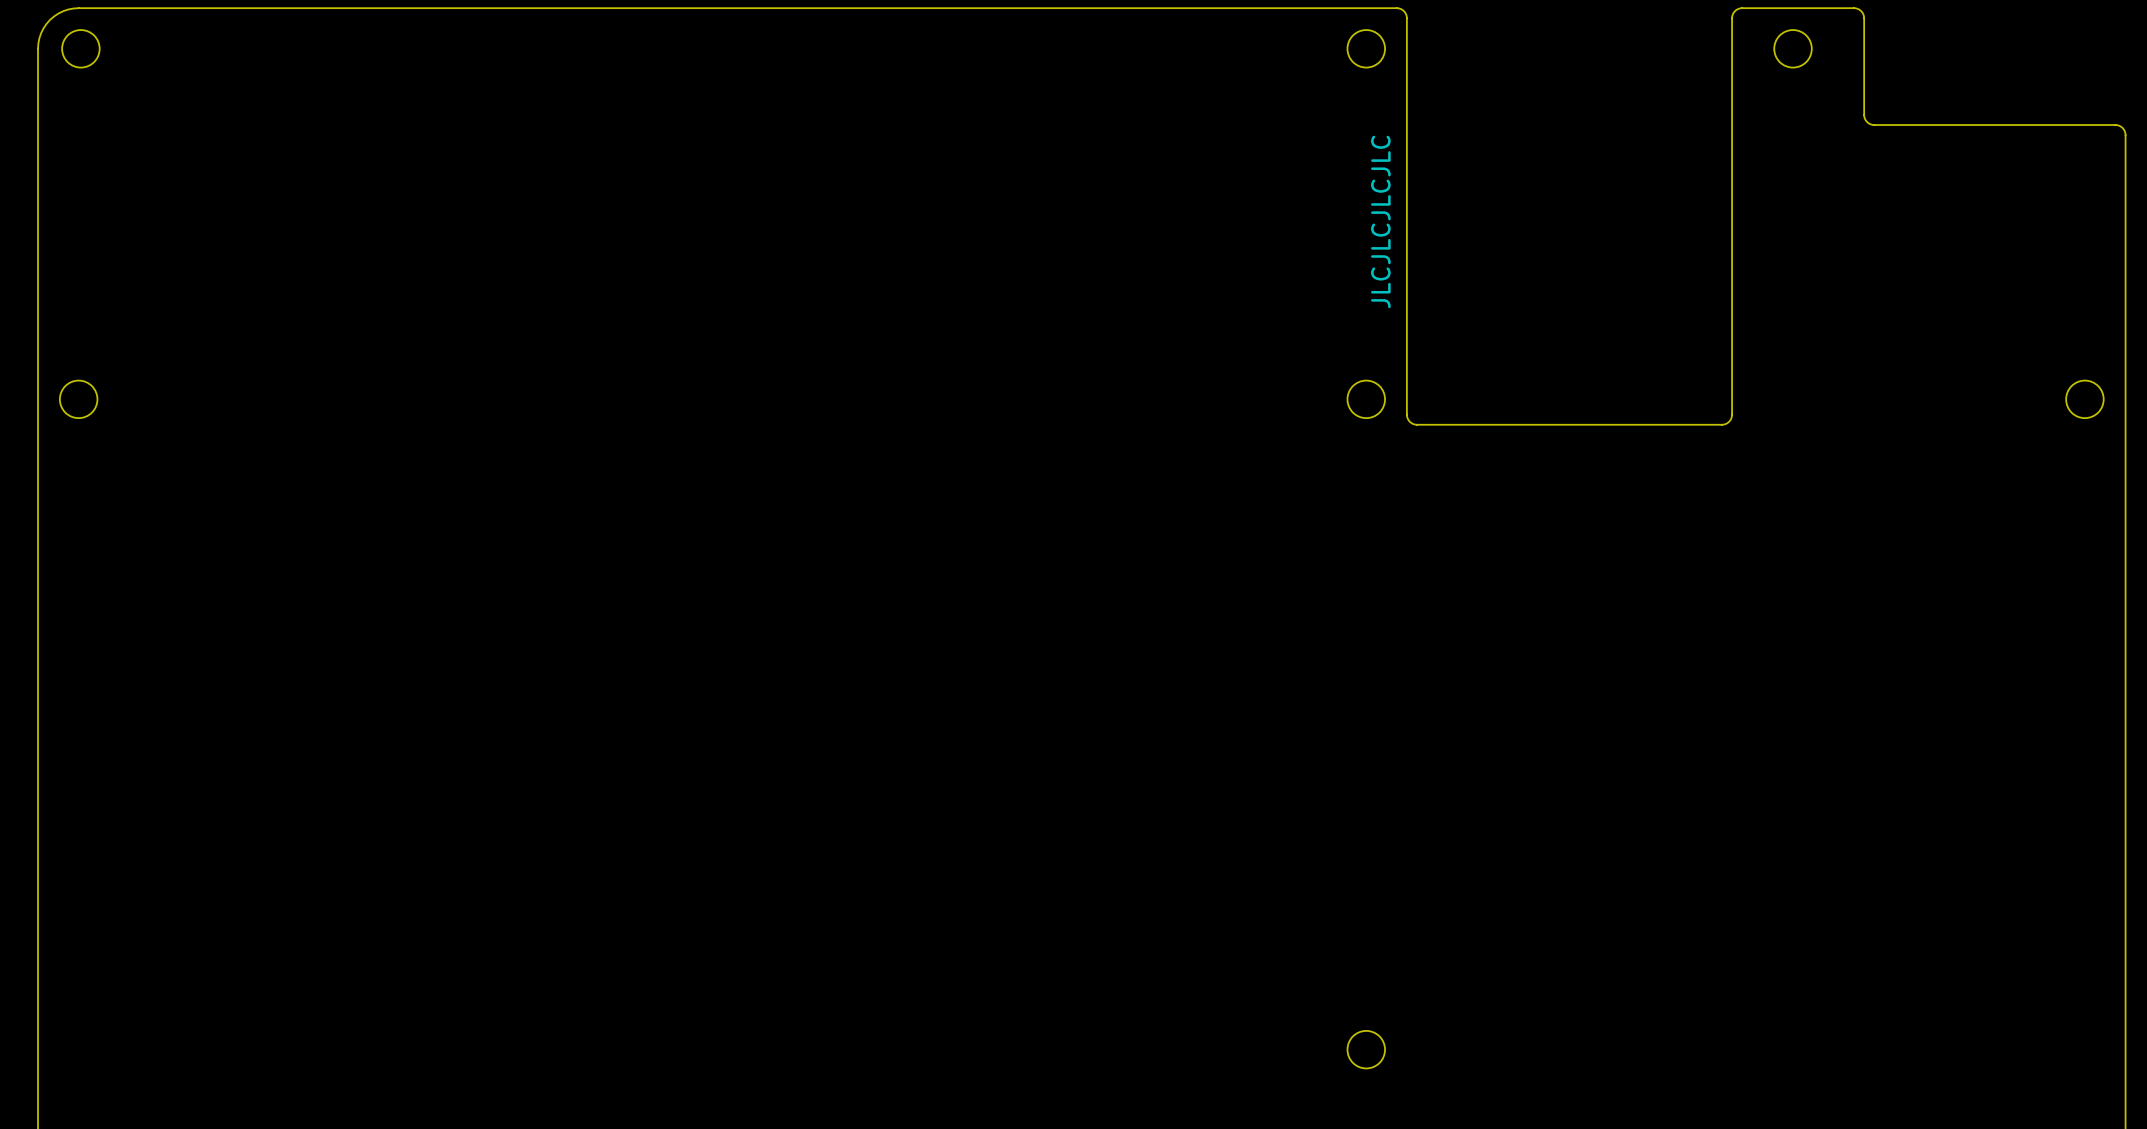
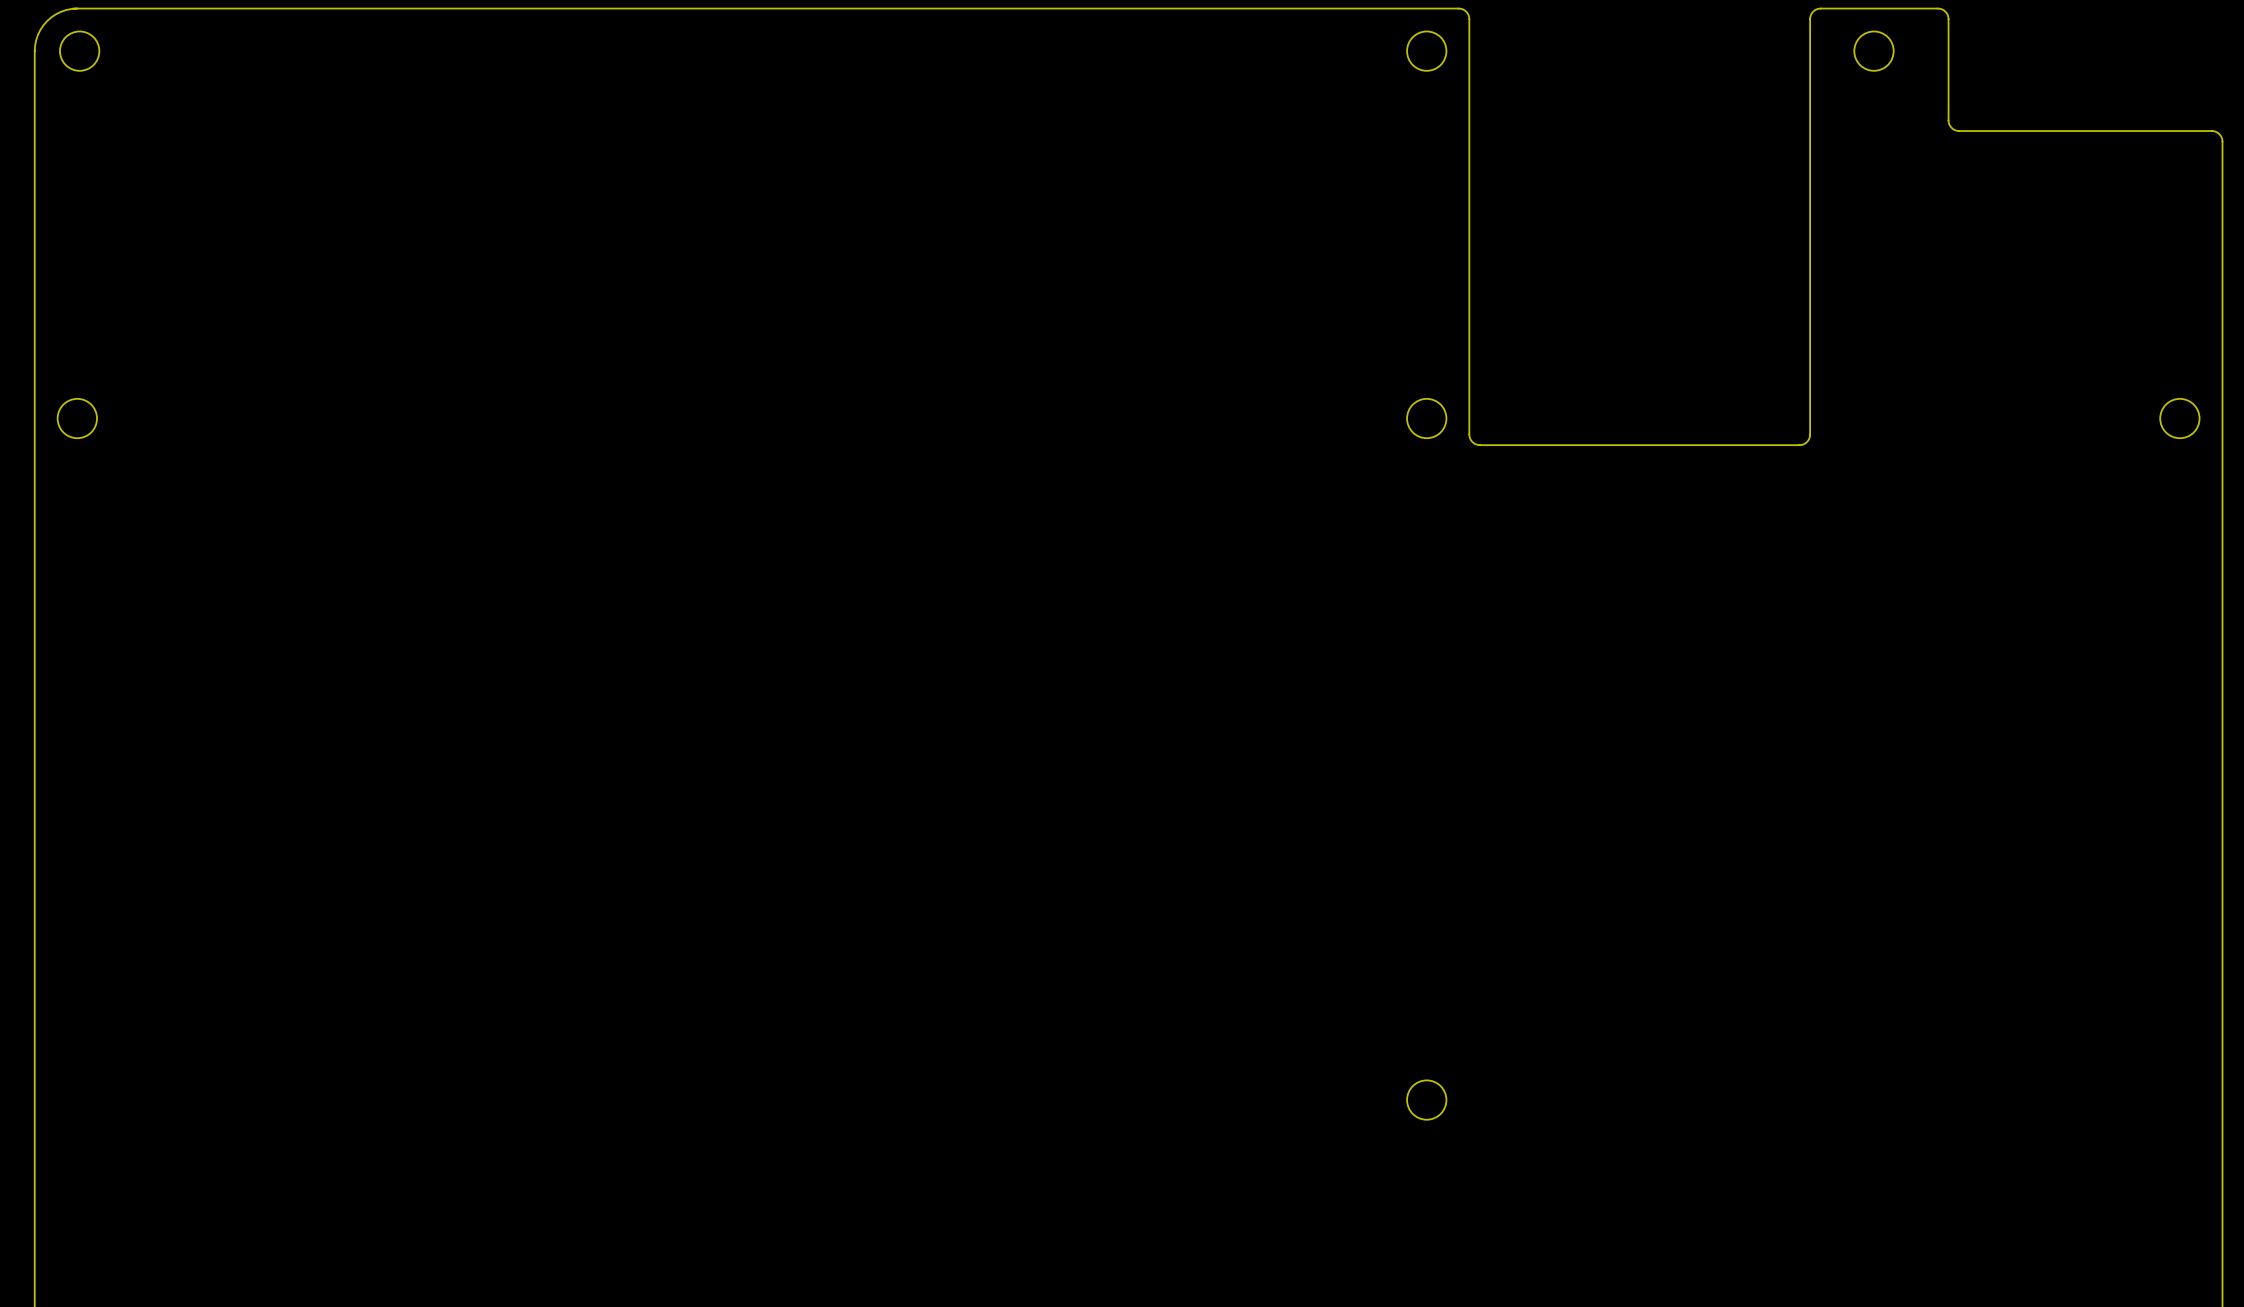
text: JLCJLCJLCJLC (1380, 221) -> none

